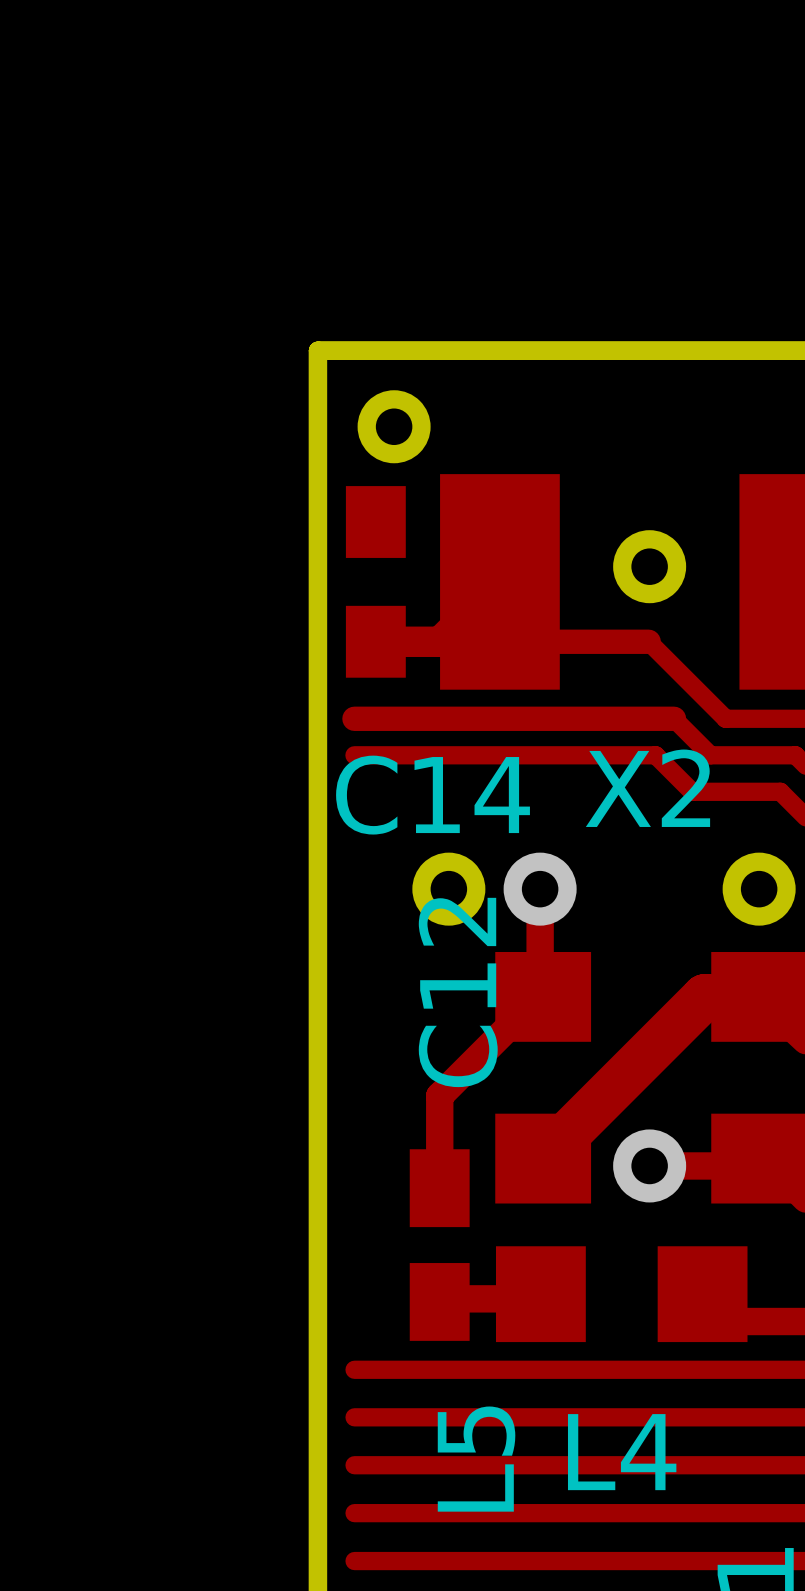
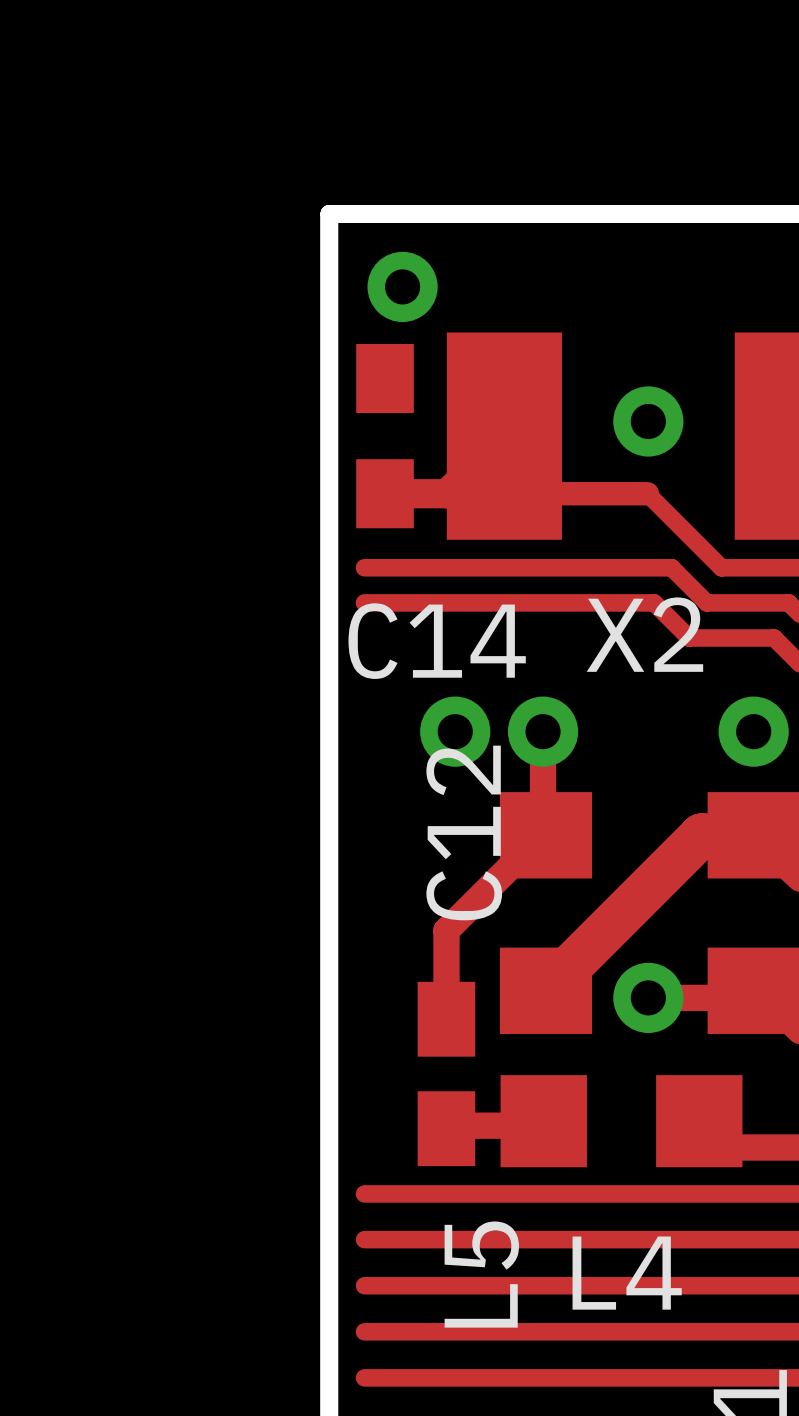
track width: thick (354, 718) (673, 718) -> thin (364, 567) (671, 567)

